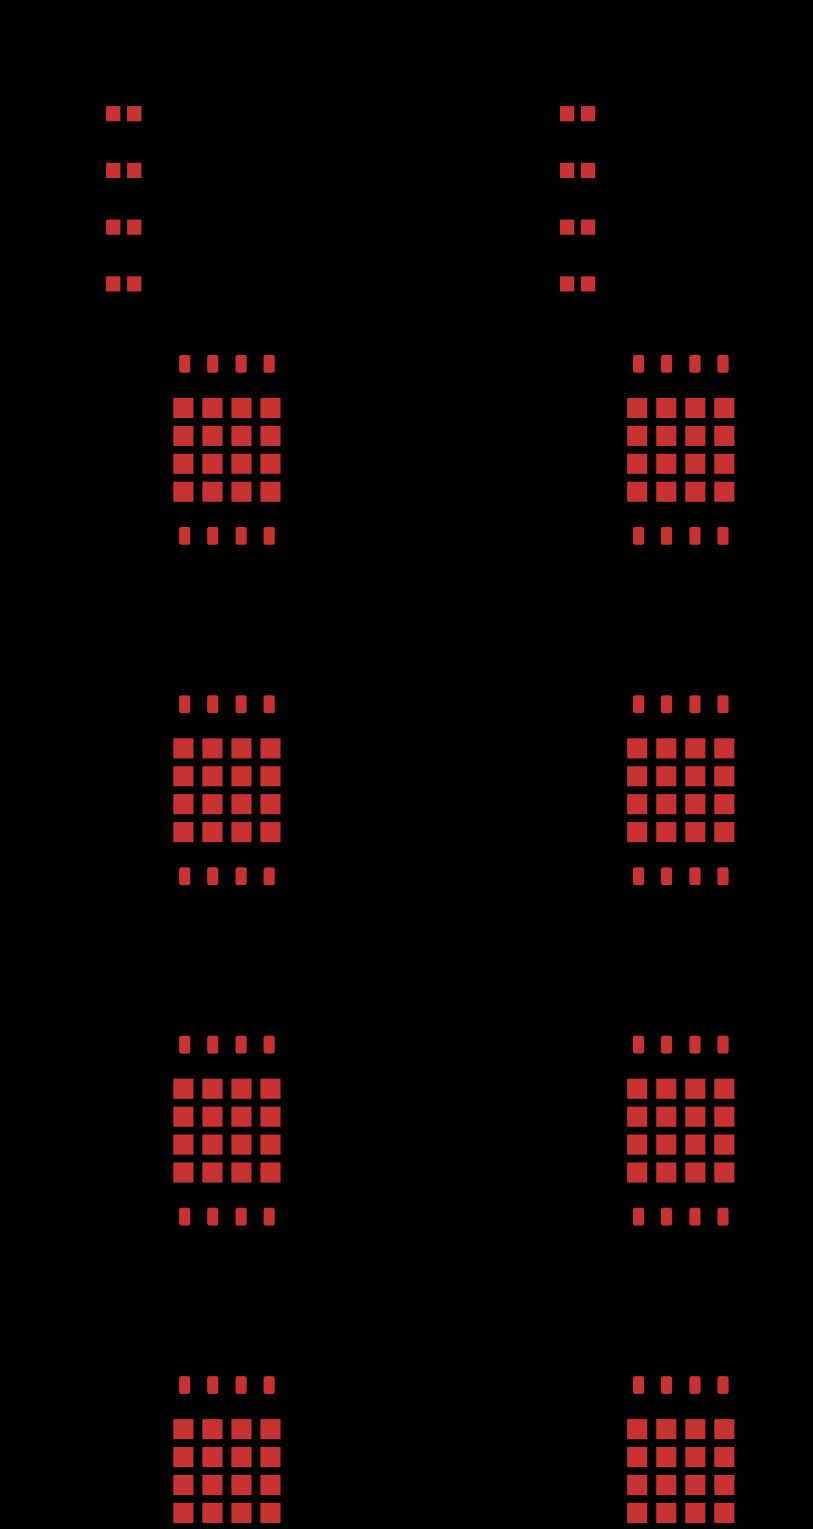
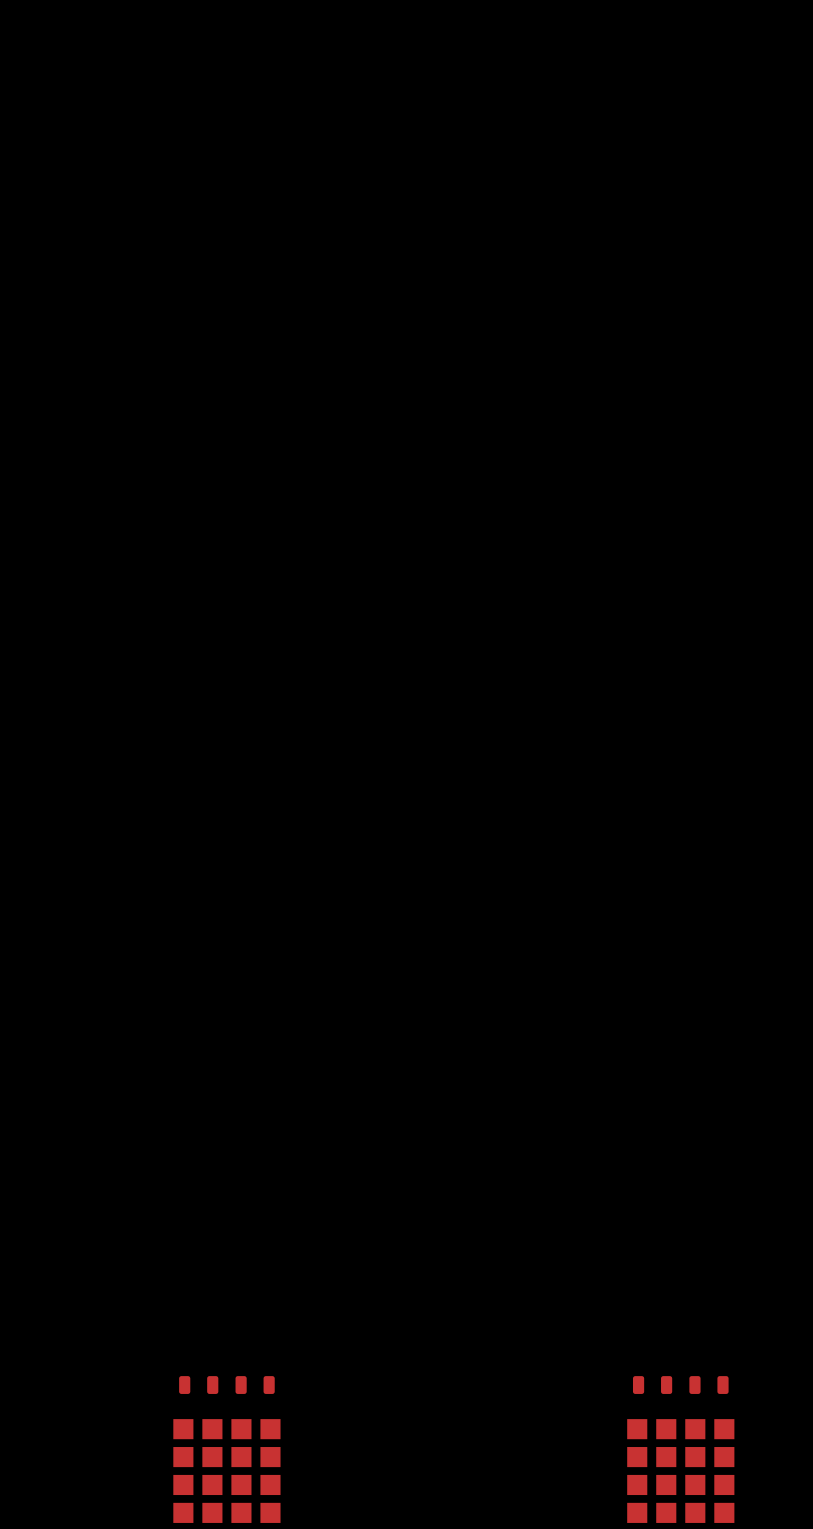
part: (123, 113) -> none
part: (577, 113) -> none
part: (123, 170) -> none
part: (577, 170) -> none
part: (123, 227) -> none
part: (577, 227) -> none
part: (123, 283) -> none
part: (577, 283) -> none
part: (226, 449) -> none
part: (680, 449) -> none
part: (226, 790) -> none
part: (680, 790) -> none
part: (226, 1130) -> none
part: (680, 1130) -> none

